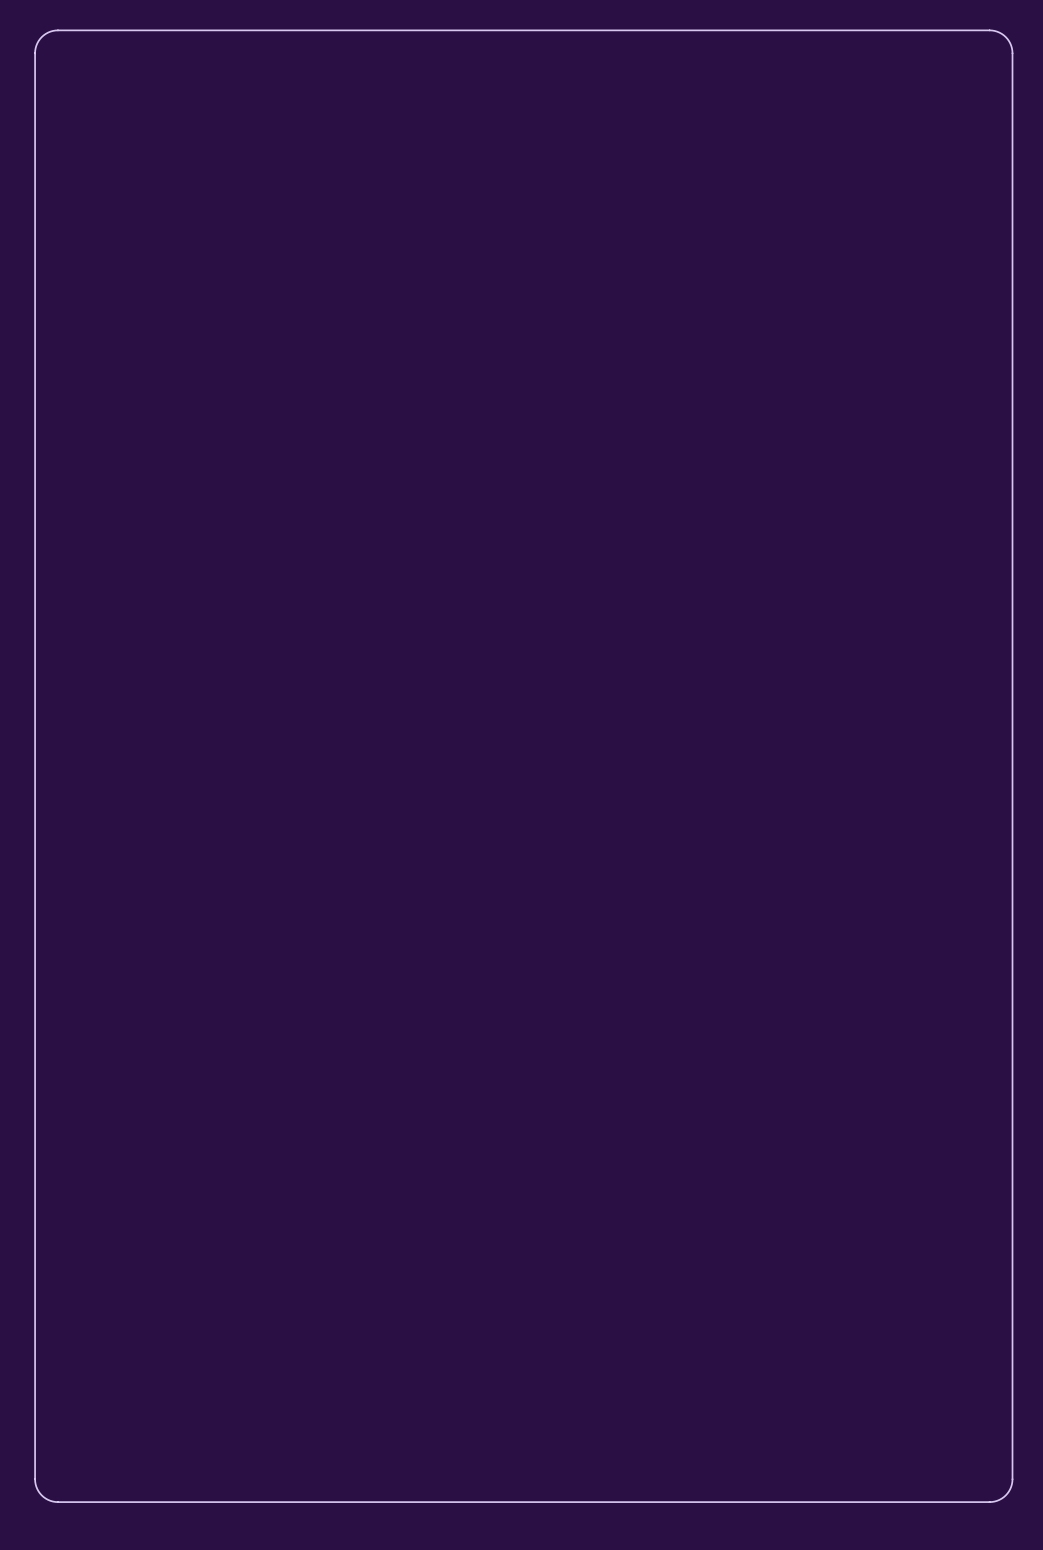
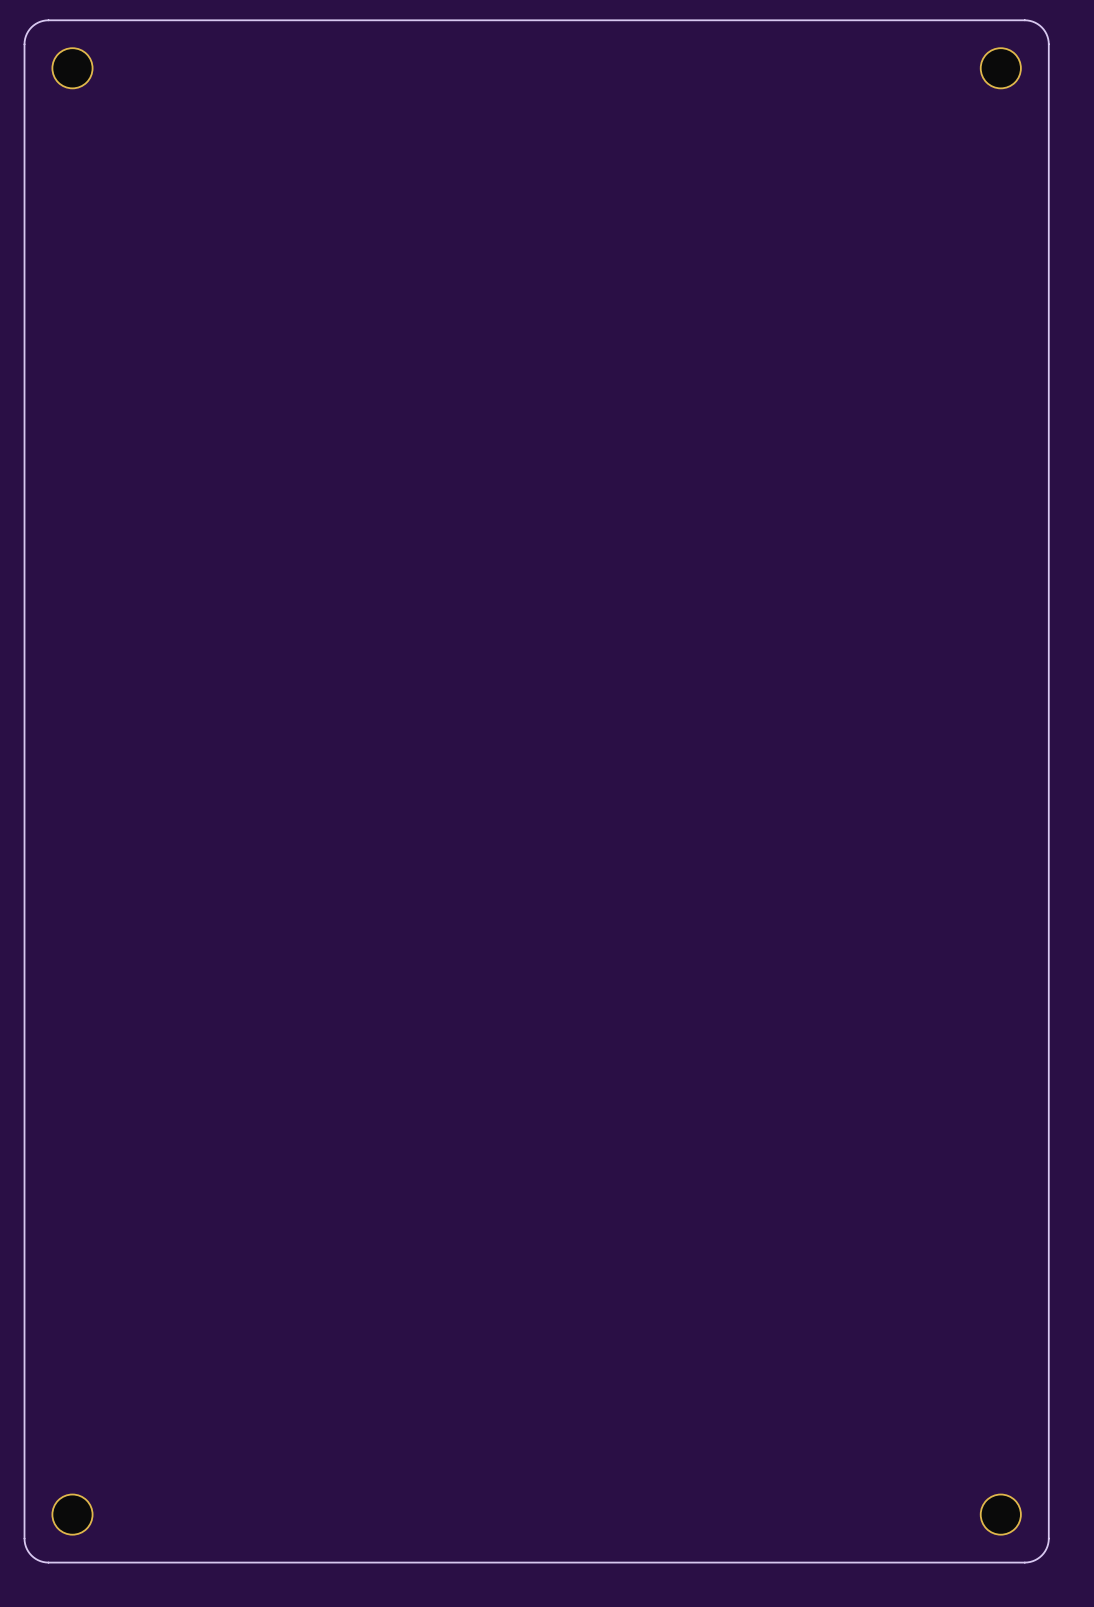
part: none -> (72, 68)
part: none -> (1000, 68)
part: none -> (72, 1514)
part: none -> (1000, 1514)

